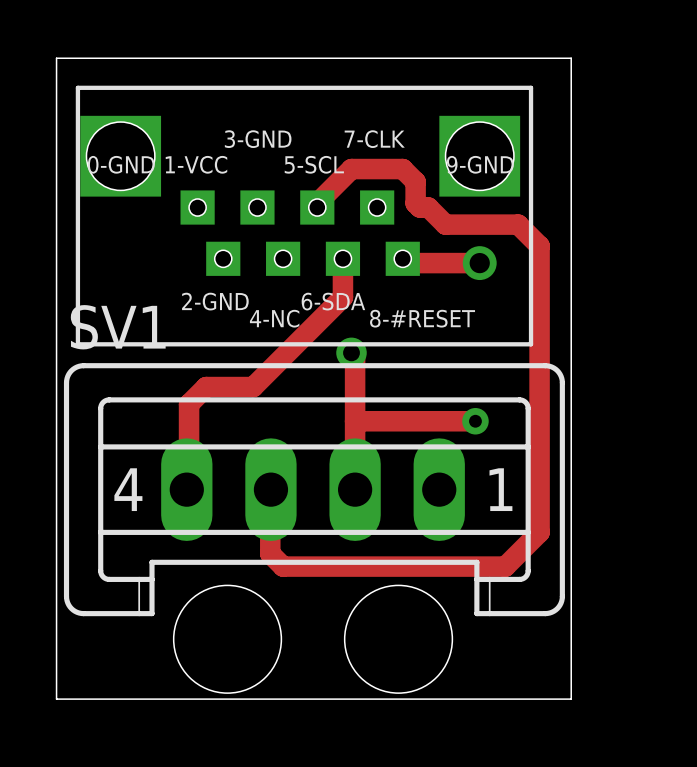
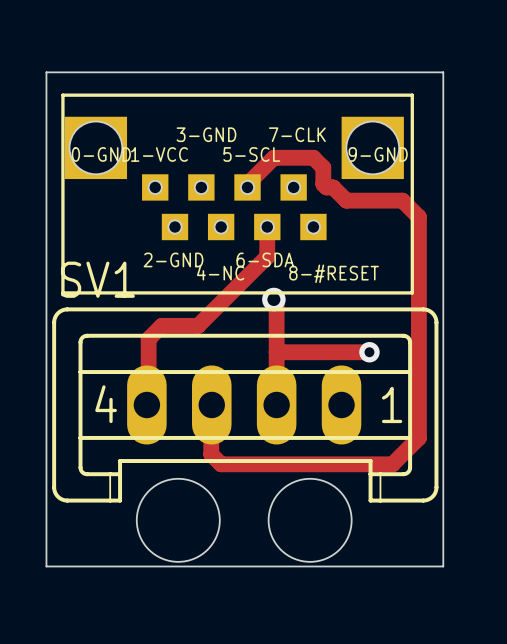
track: (402, 258) (407, 263) (479, 263) -> none
via: (479, 263) -> none

